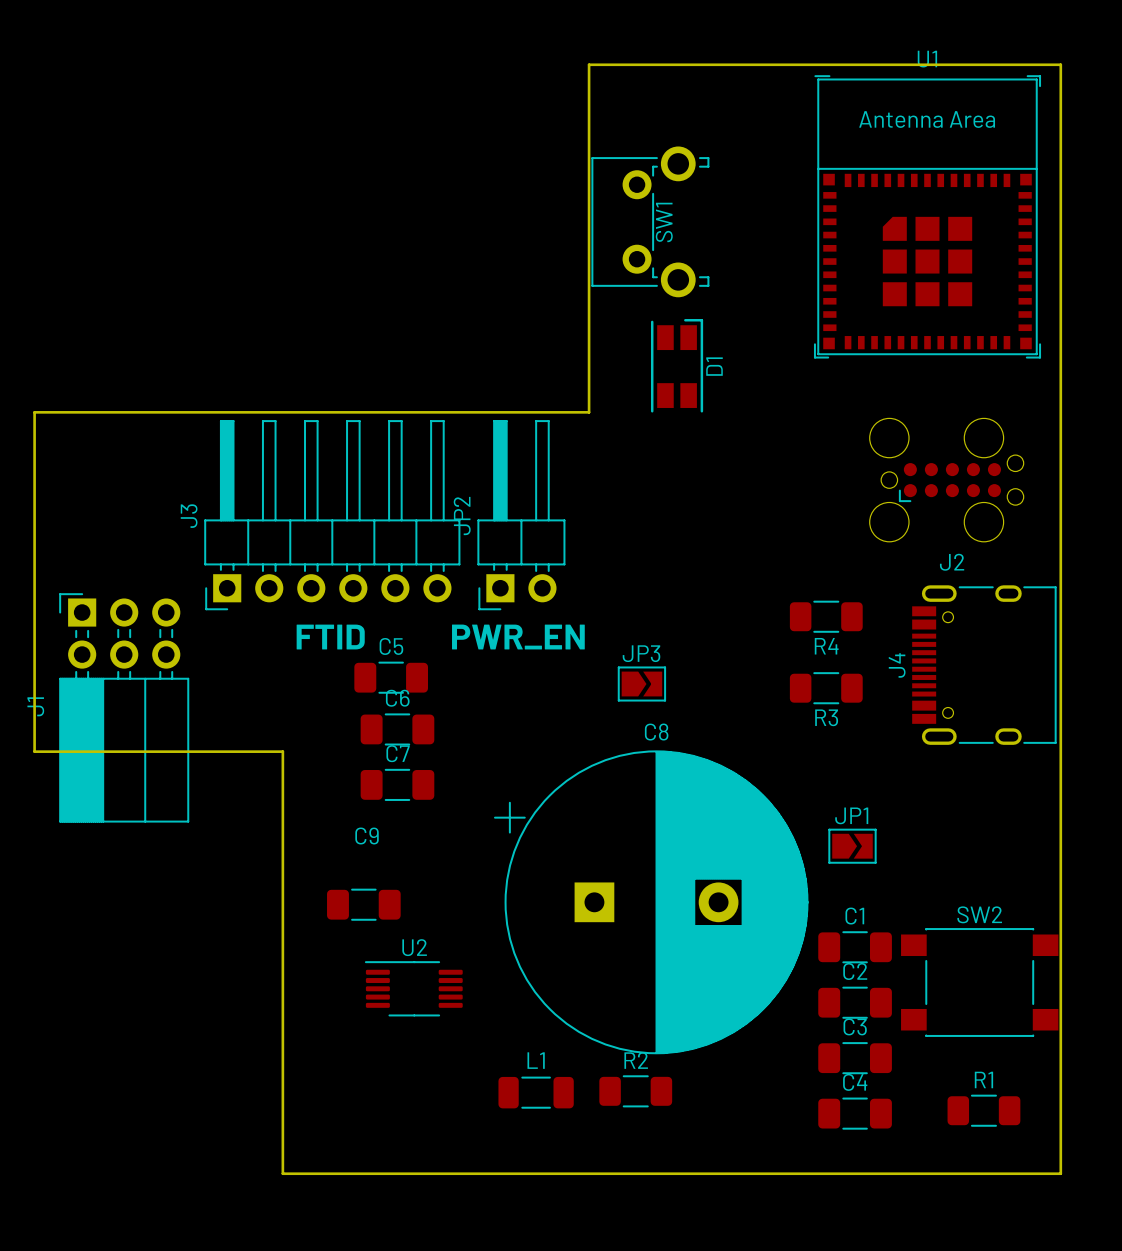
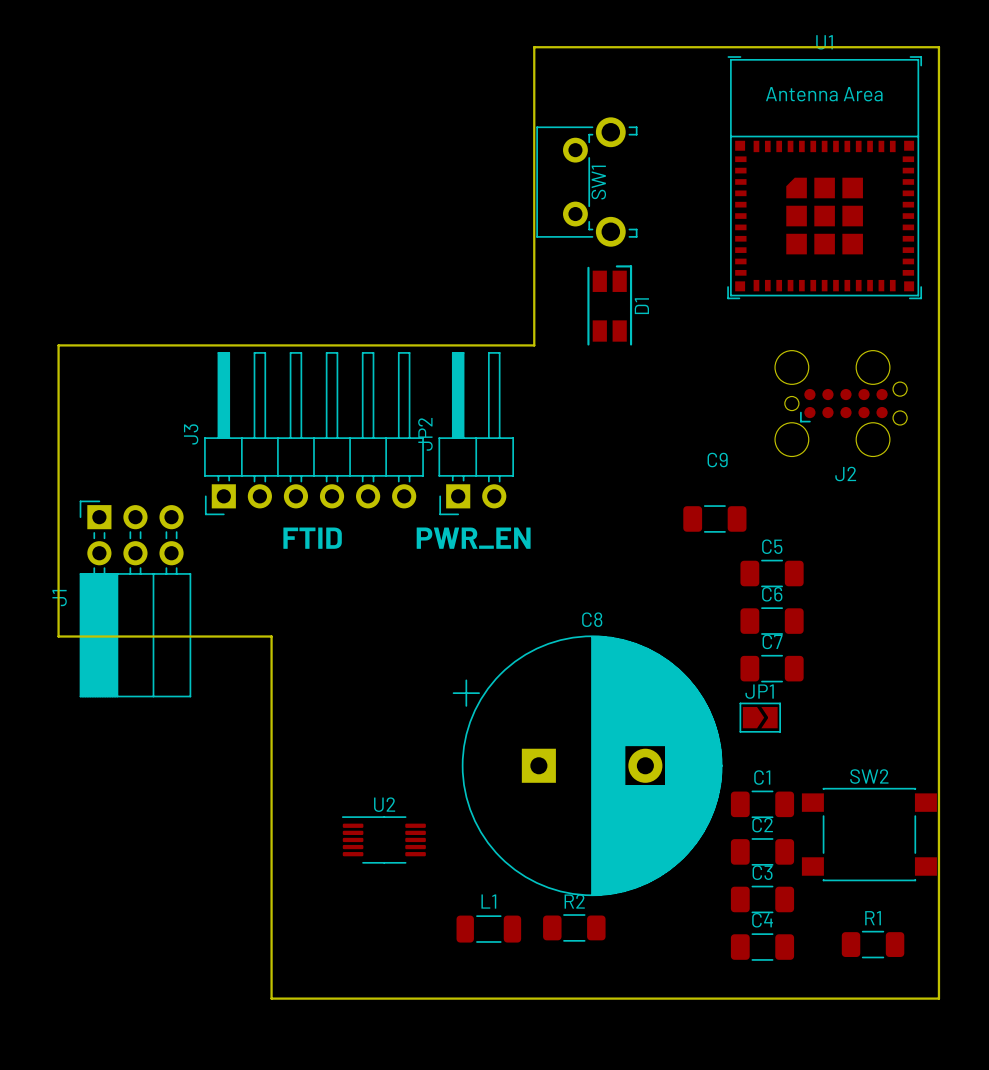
R4: (826, 616) -> none
J4: (984, 665) -> none
C5 position: (391, 677) -> (772, 573)
JP3: (641, 684) -> none
R3: (826, 688) -> none
C6 position: (397, 729) -> (772, 621)
C7 position: (397, 784) -> (772, 668)
C9 position: (363, 904) -> (714, 518)

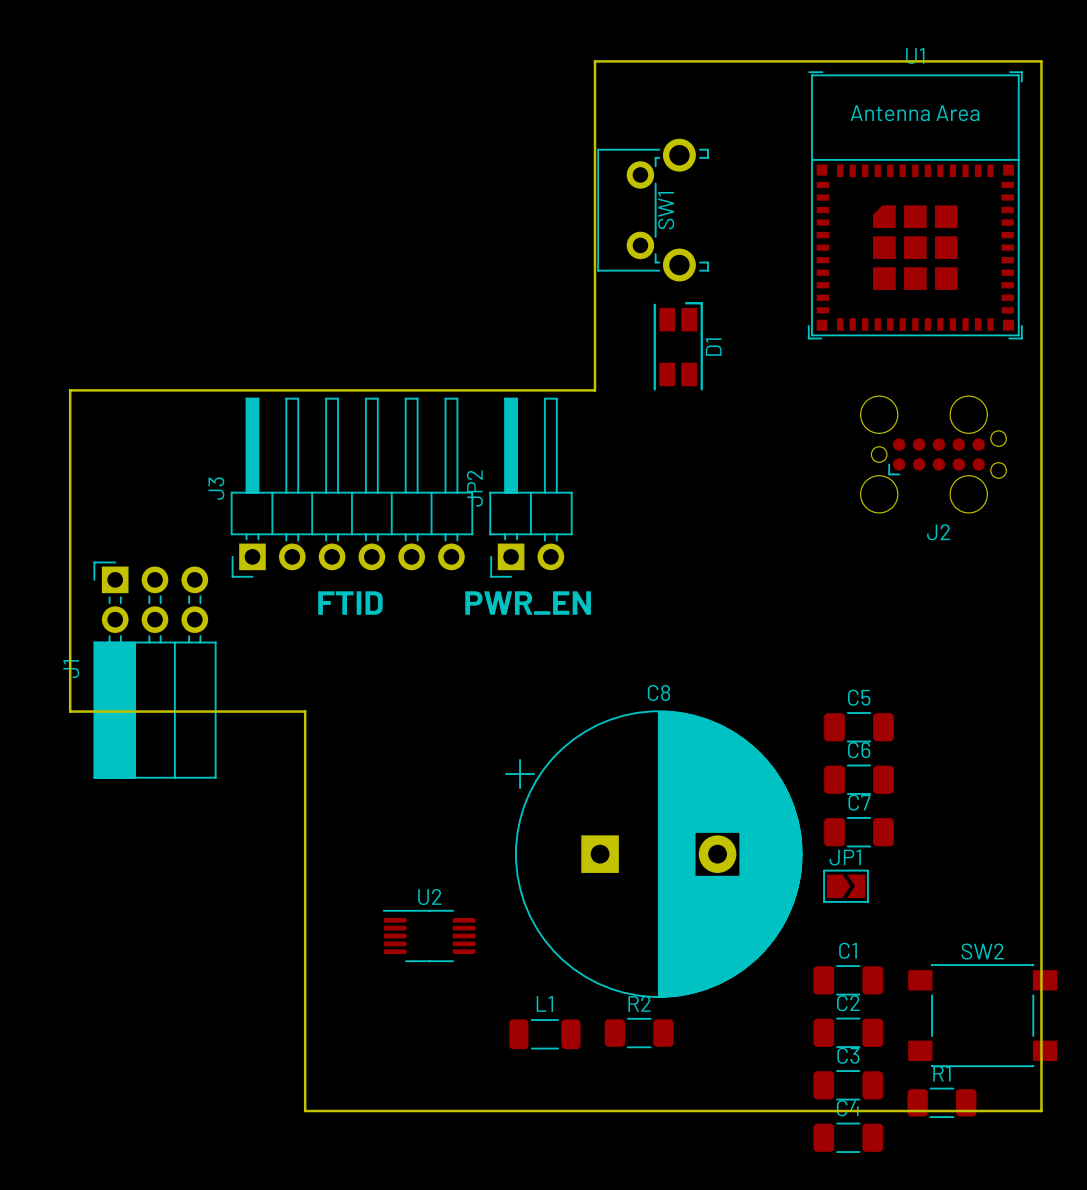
C9: (714, 518) -> none
C5 position: (772, 573) -> (858, 727)
C6 position: (772, 621) -> (858, 779)
C7 position: (772, 668) -> (858, 832)
JP1 position: (760, 717) -> (845, 886)
C1 position: (762, 804) -> (848, 980)
SW2 position: (869, 834) -> (982, 1015)
C2 position: (762, 851) -> (848, 1032)
C3 position: (762, 899) -> (848, 1085)
R1 position: (873, 944) -> (941, 1102)
C4 position: (762, 947) -> (848, 1137)

